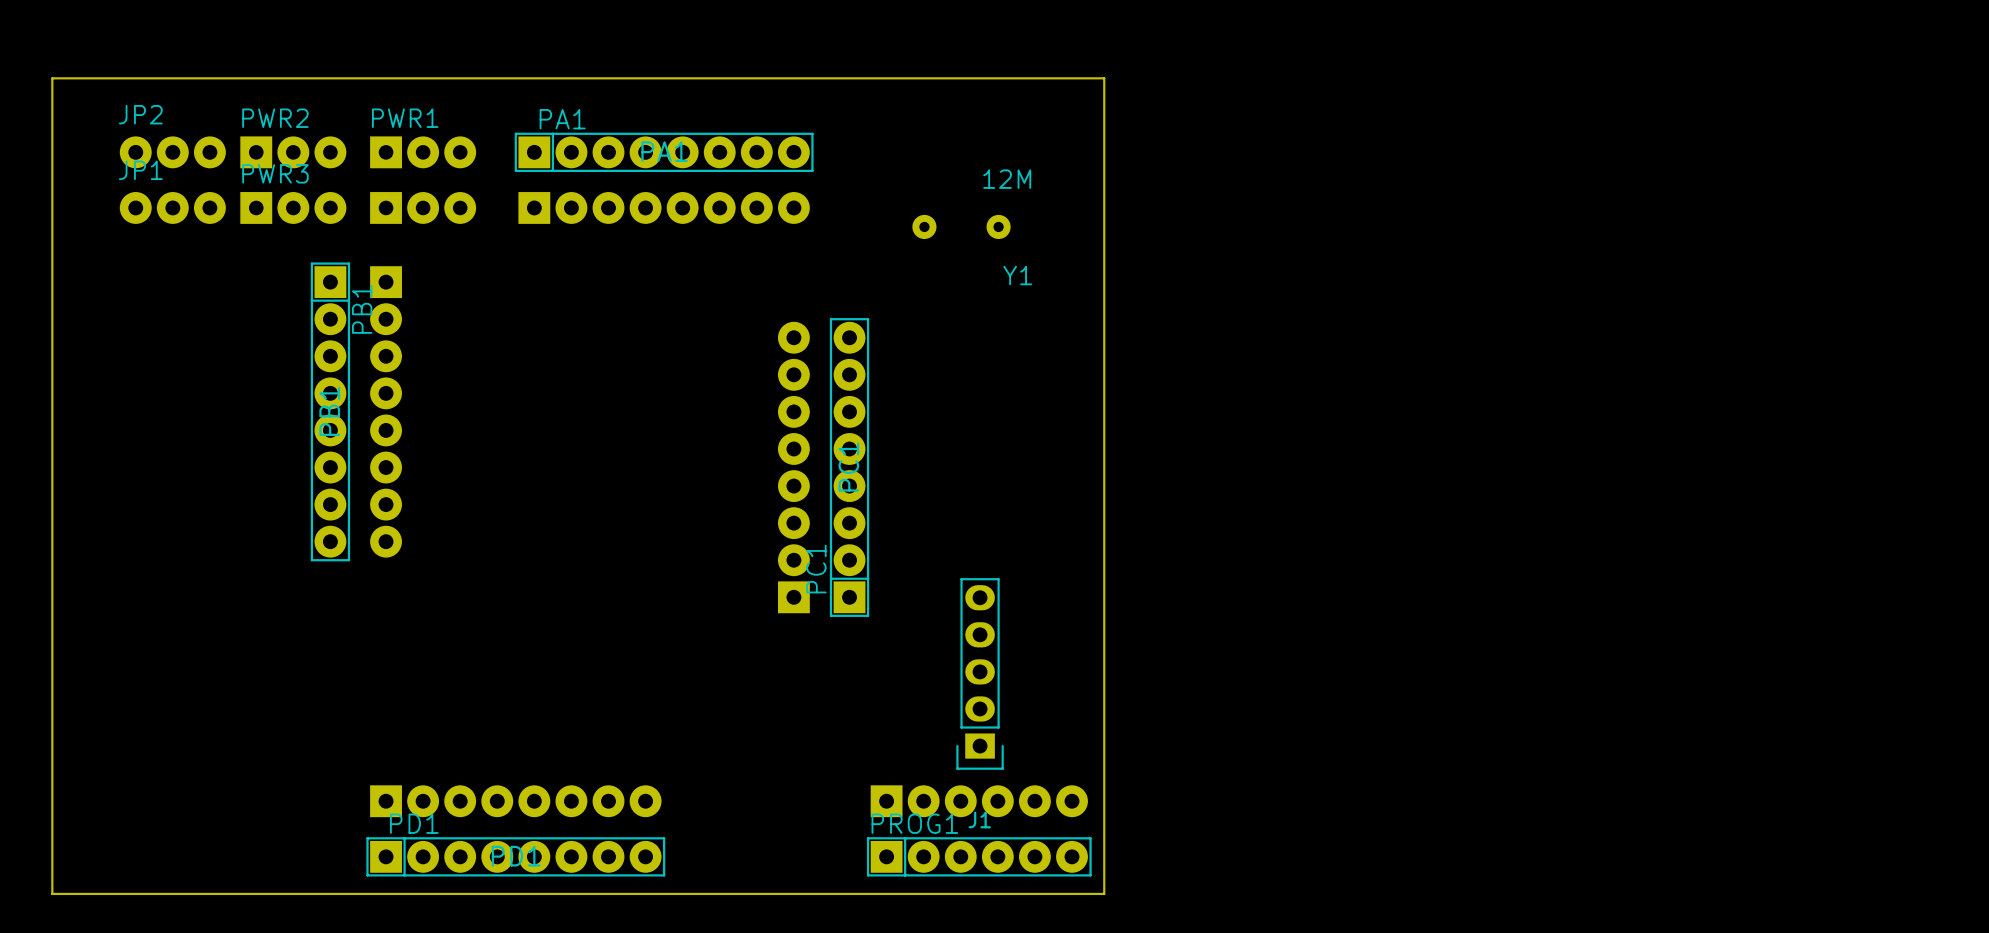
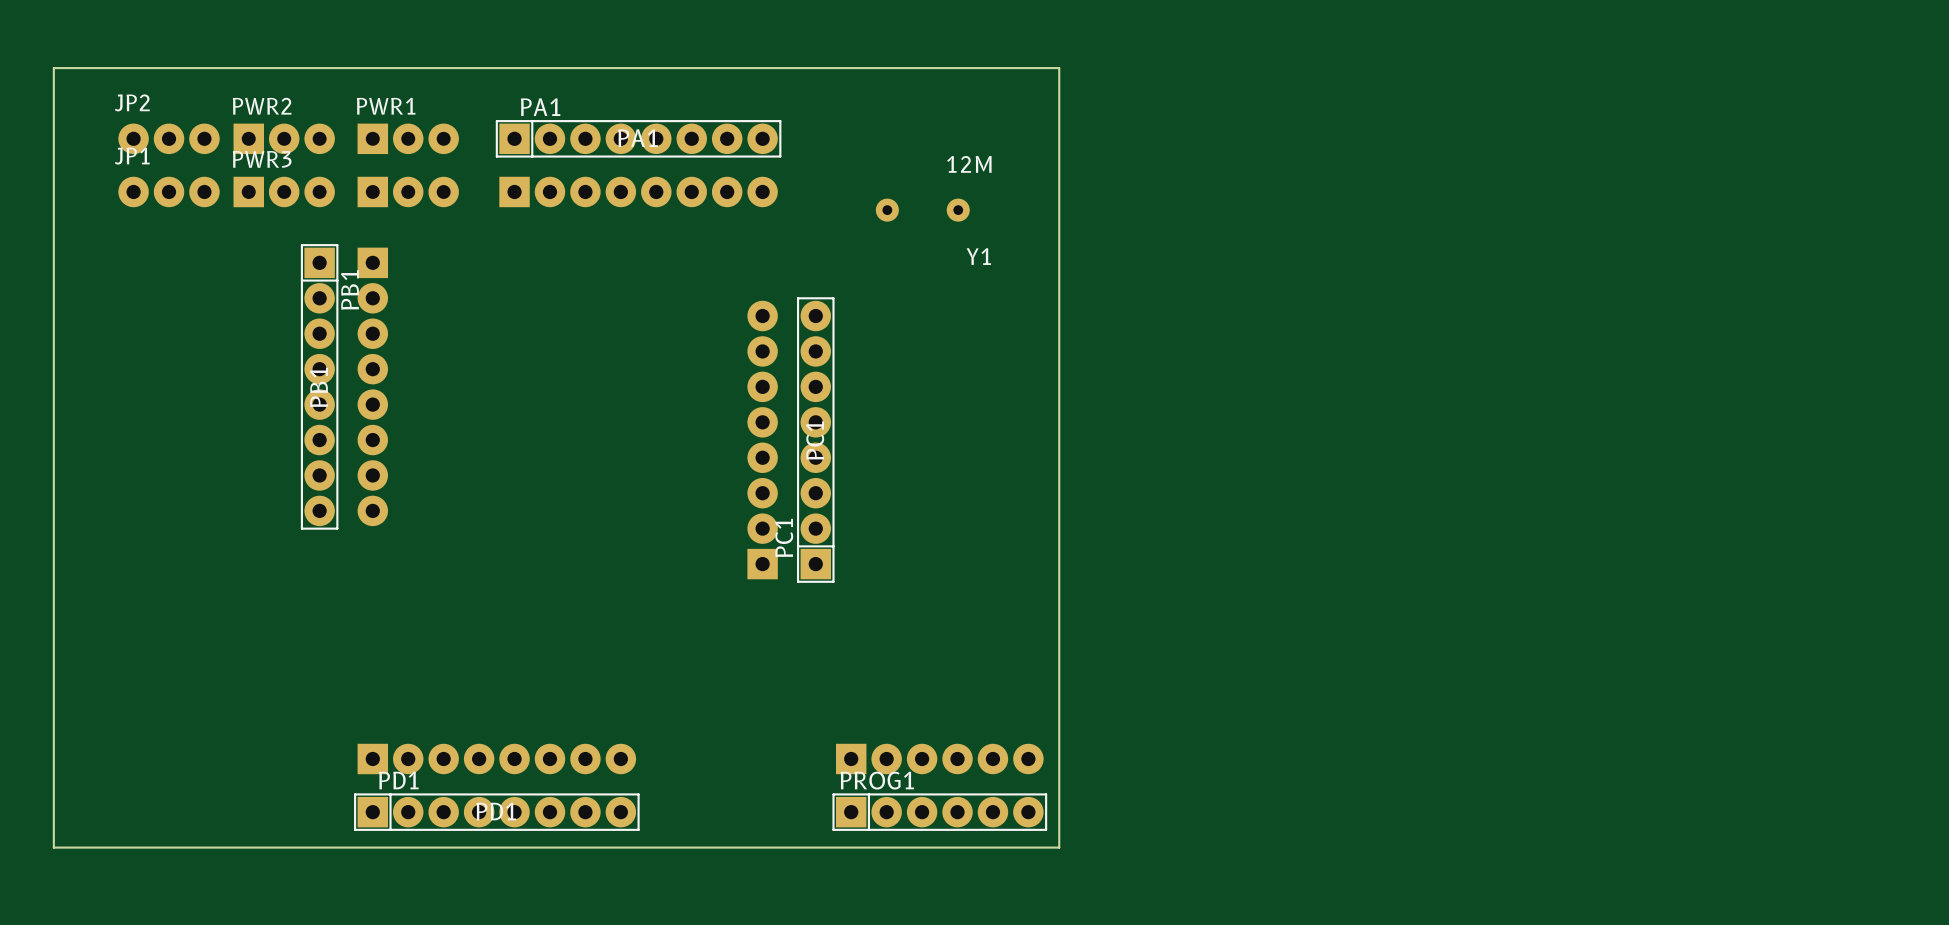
J1: (980, 673) -> none

